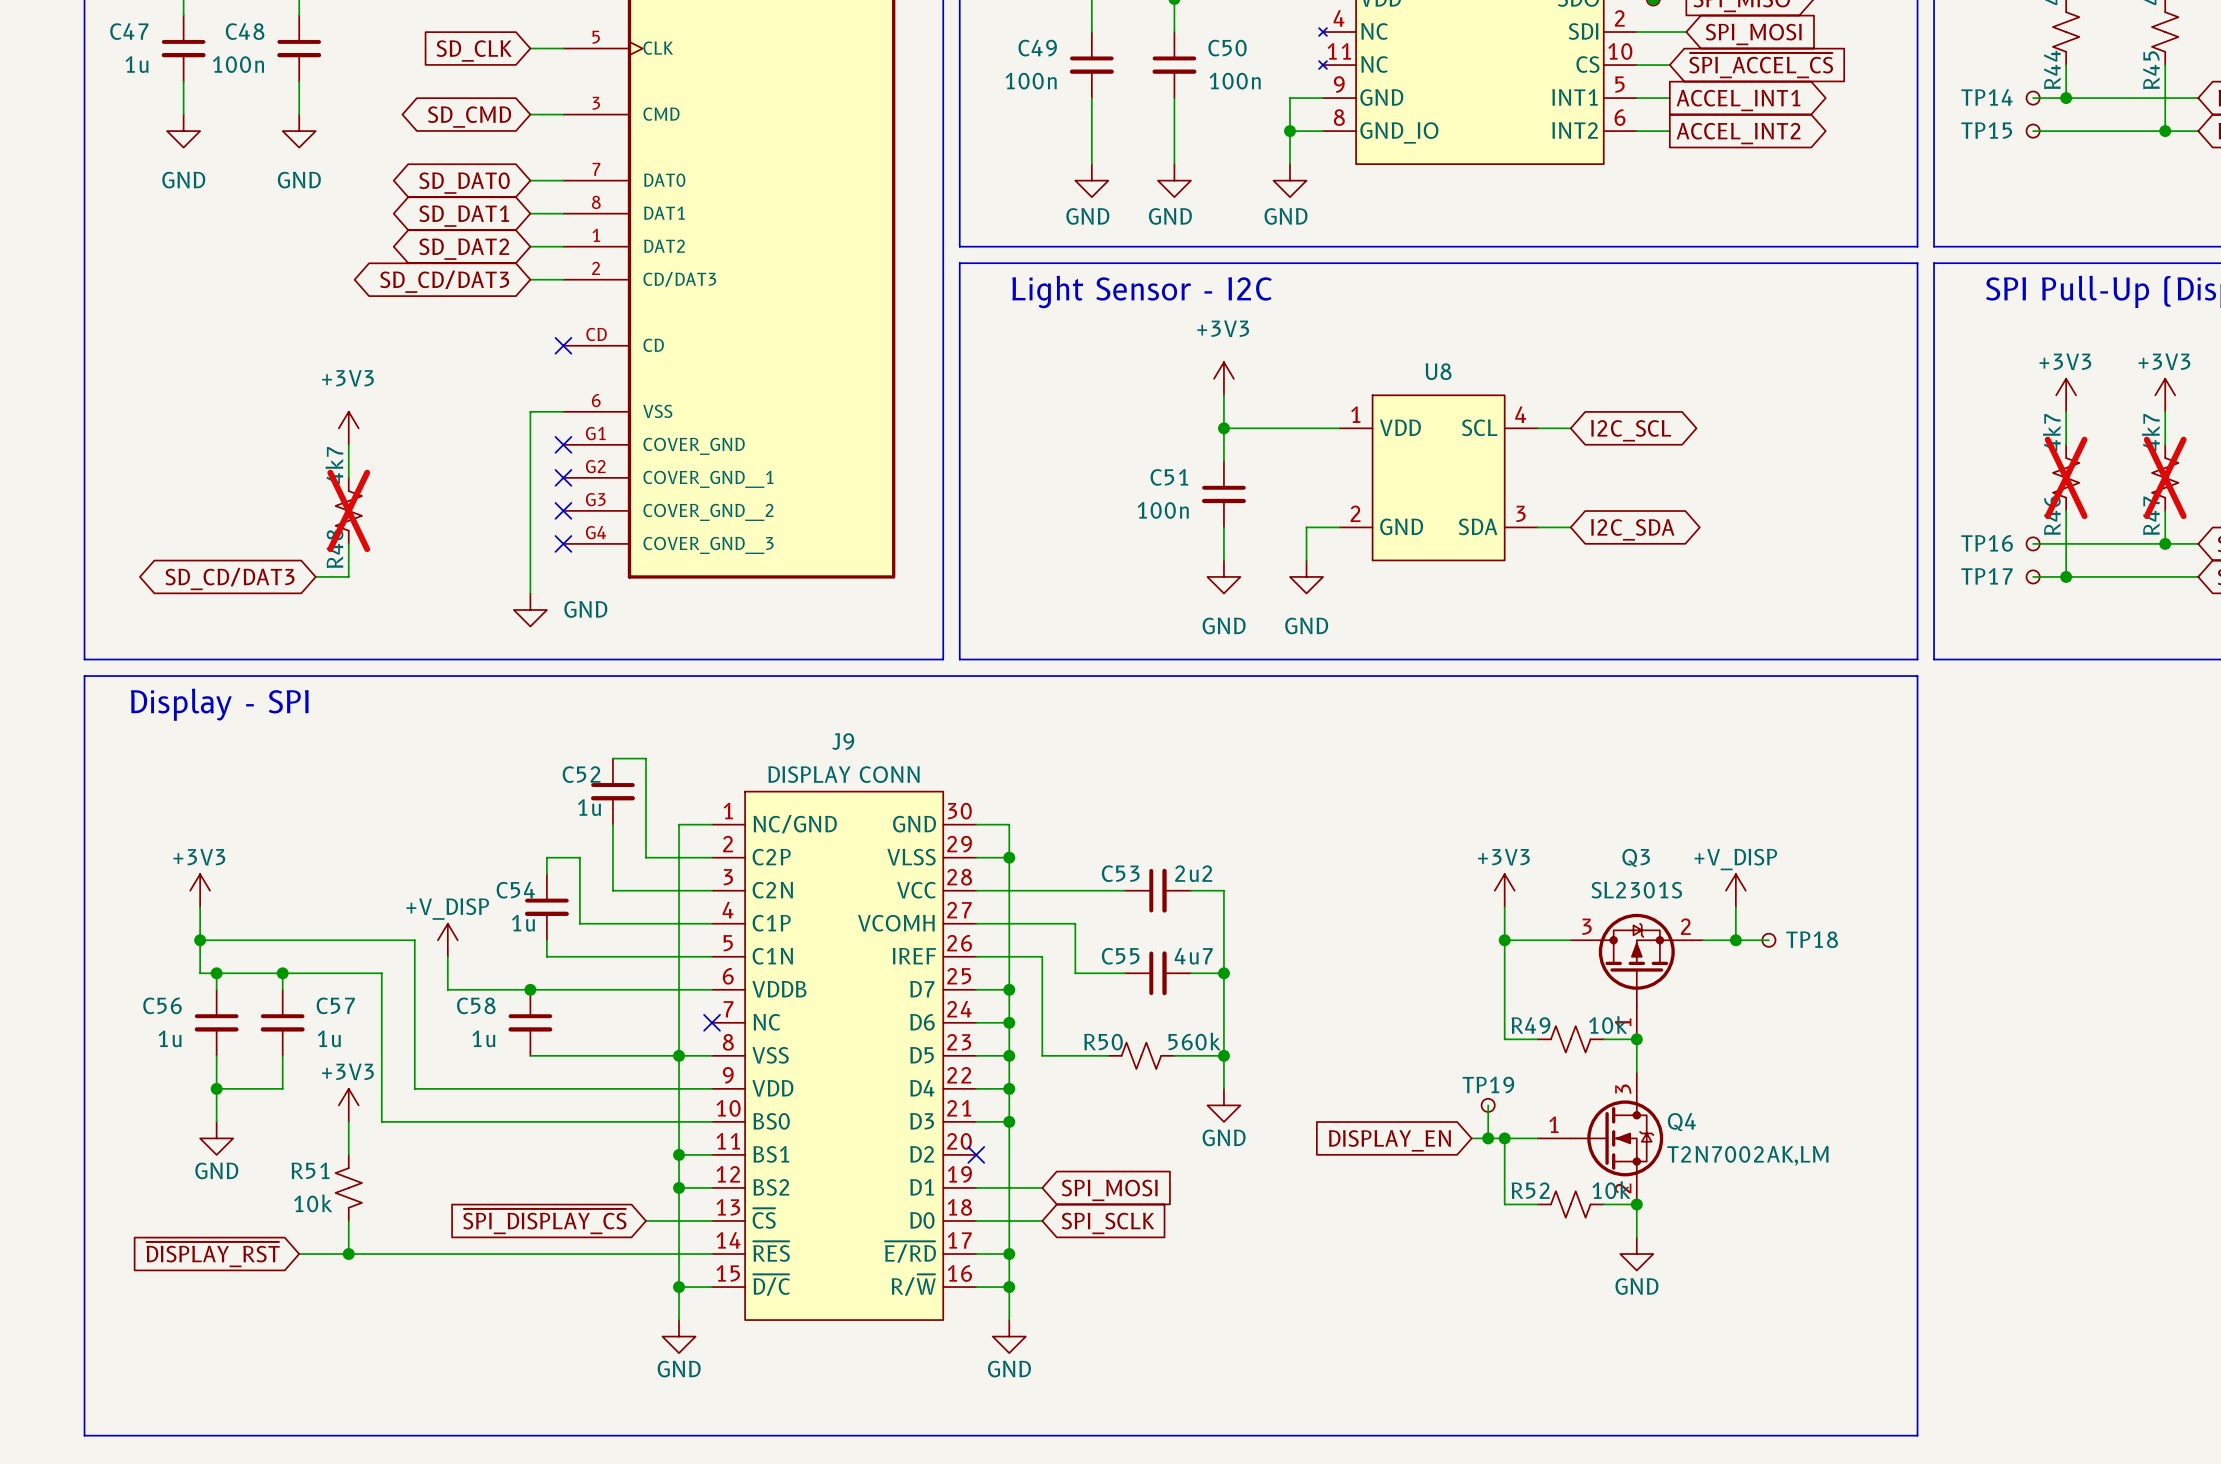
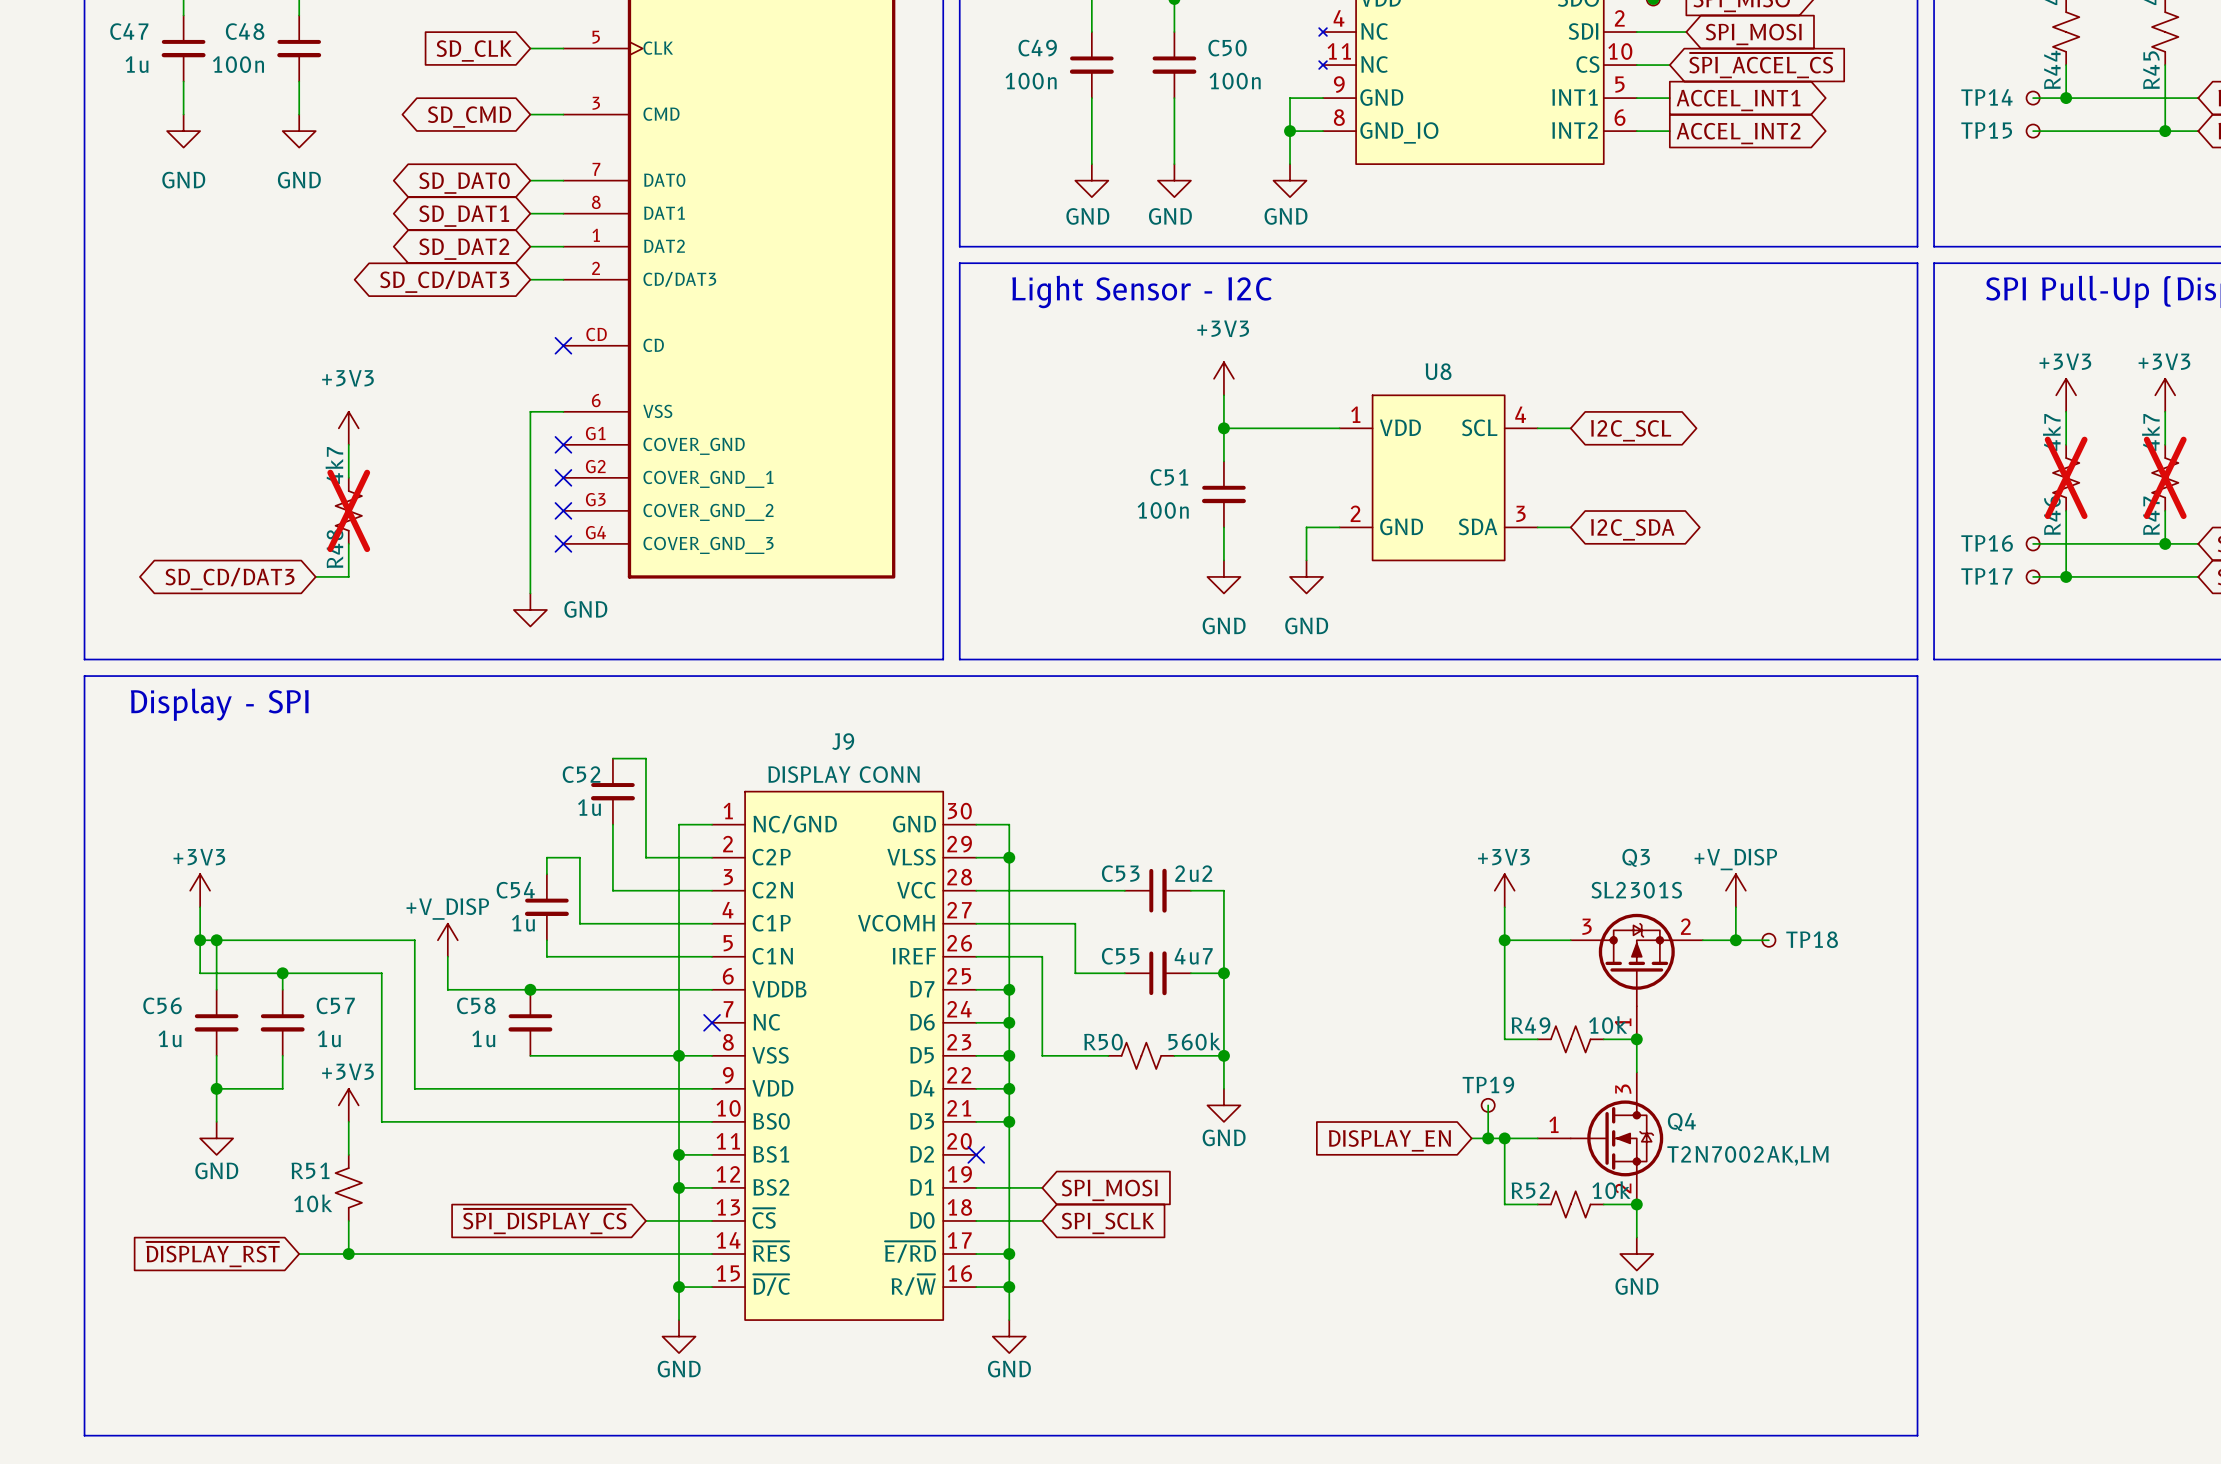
wire: none -> (216, 940) (216, 973)
junction position: (216, 973) -> (216, 940)

